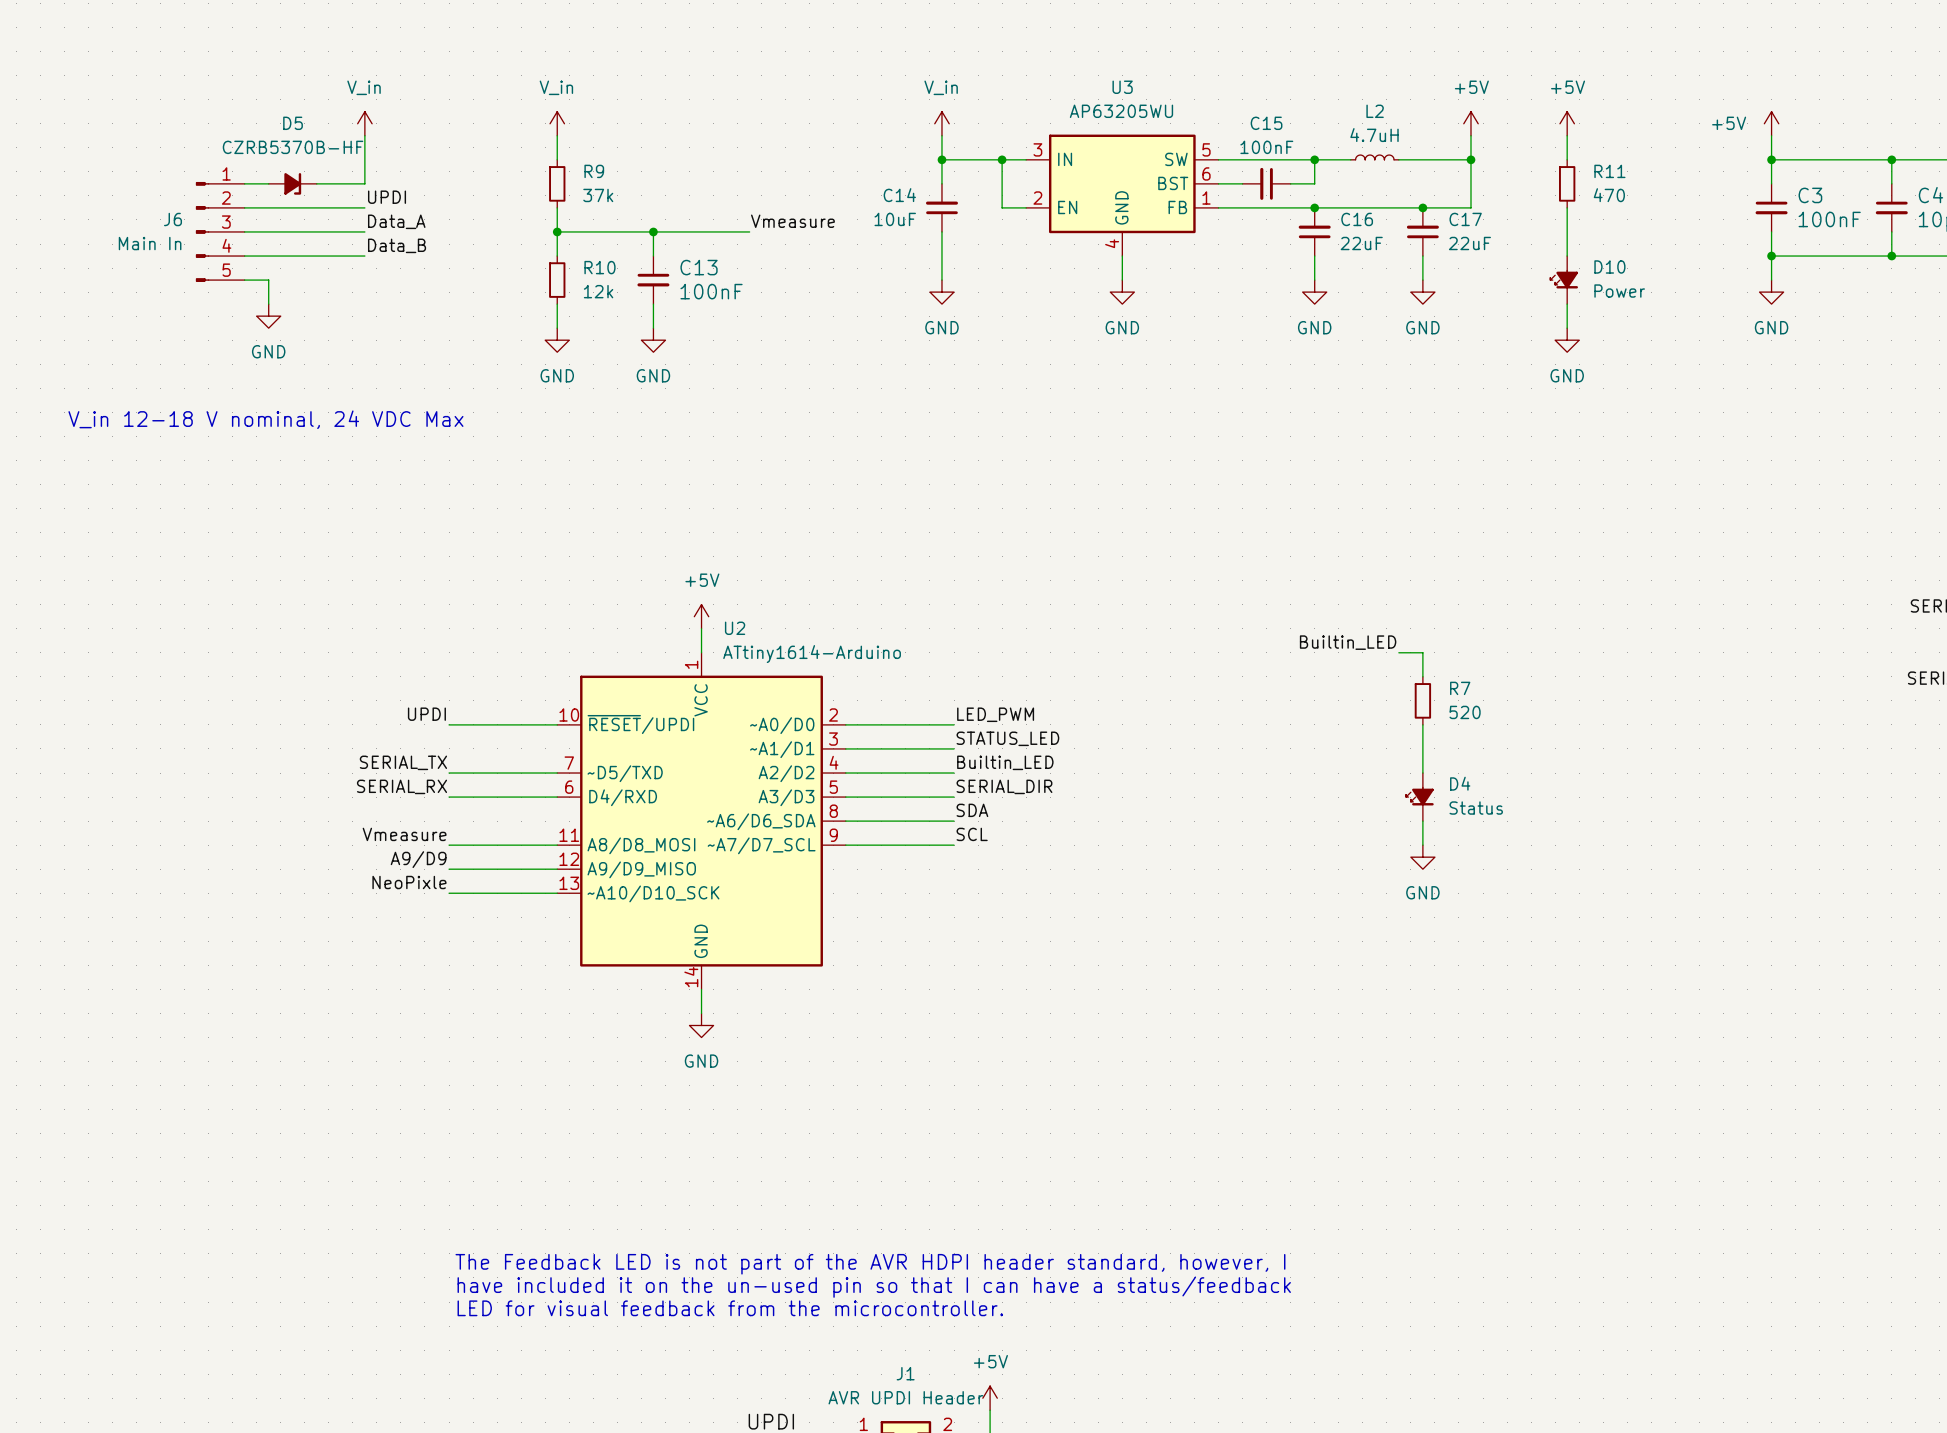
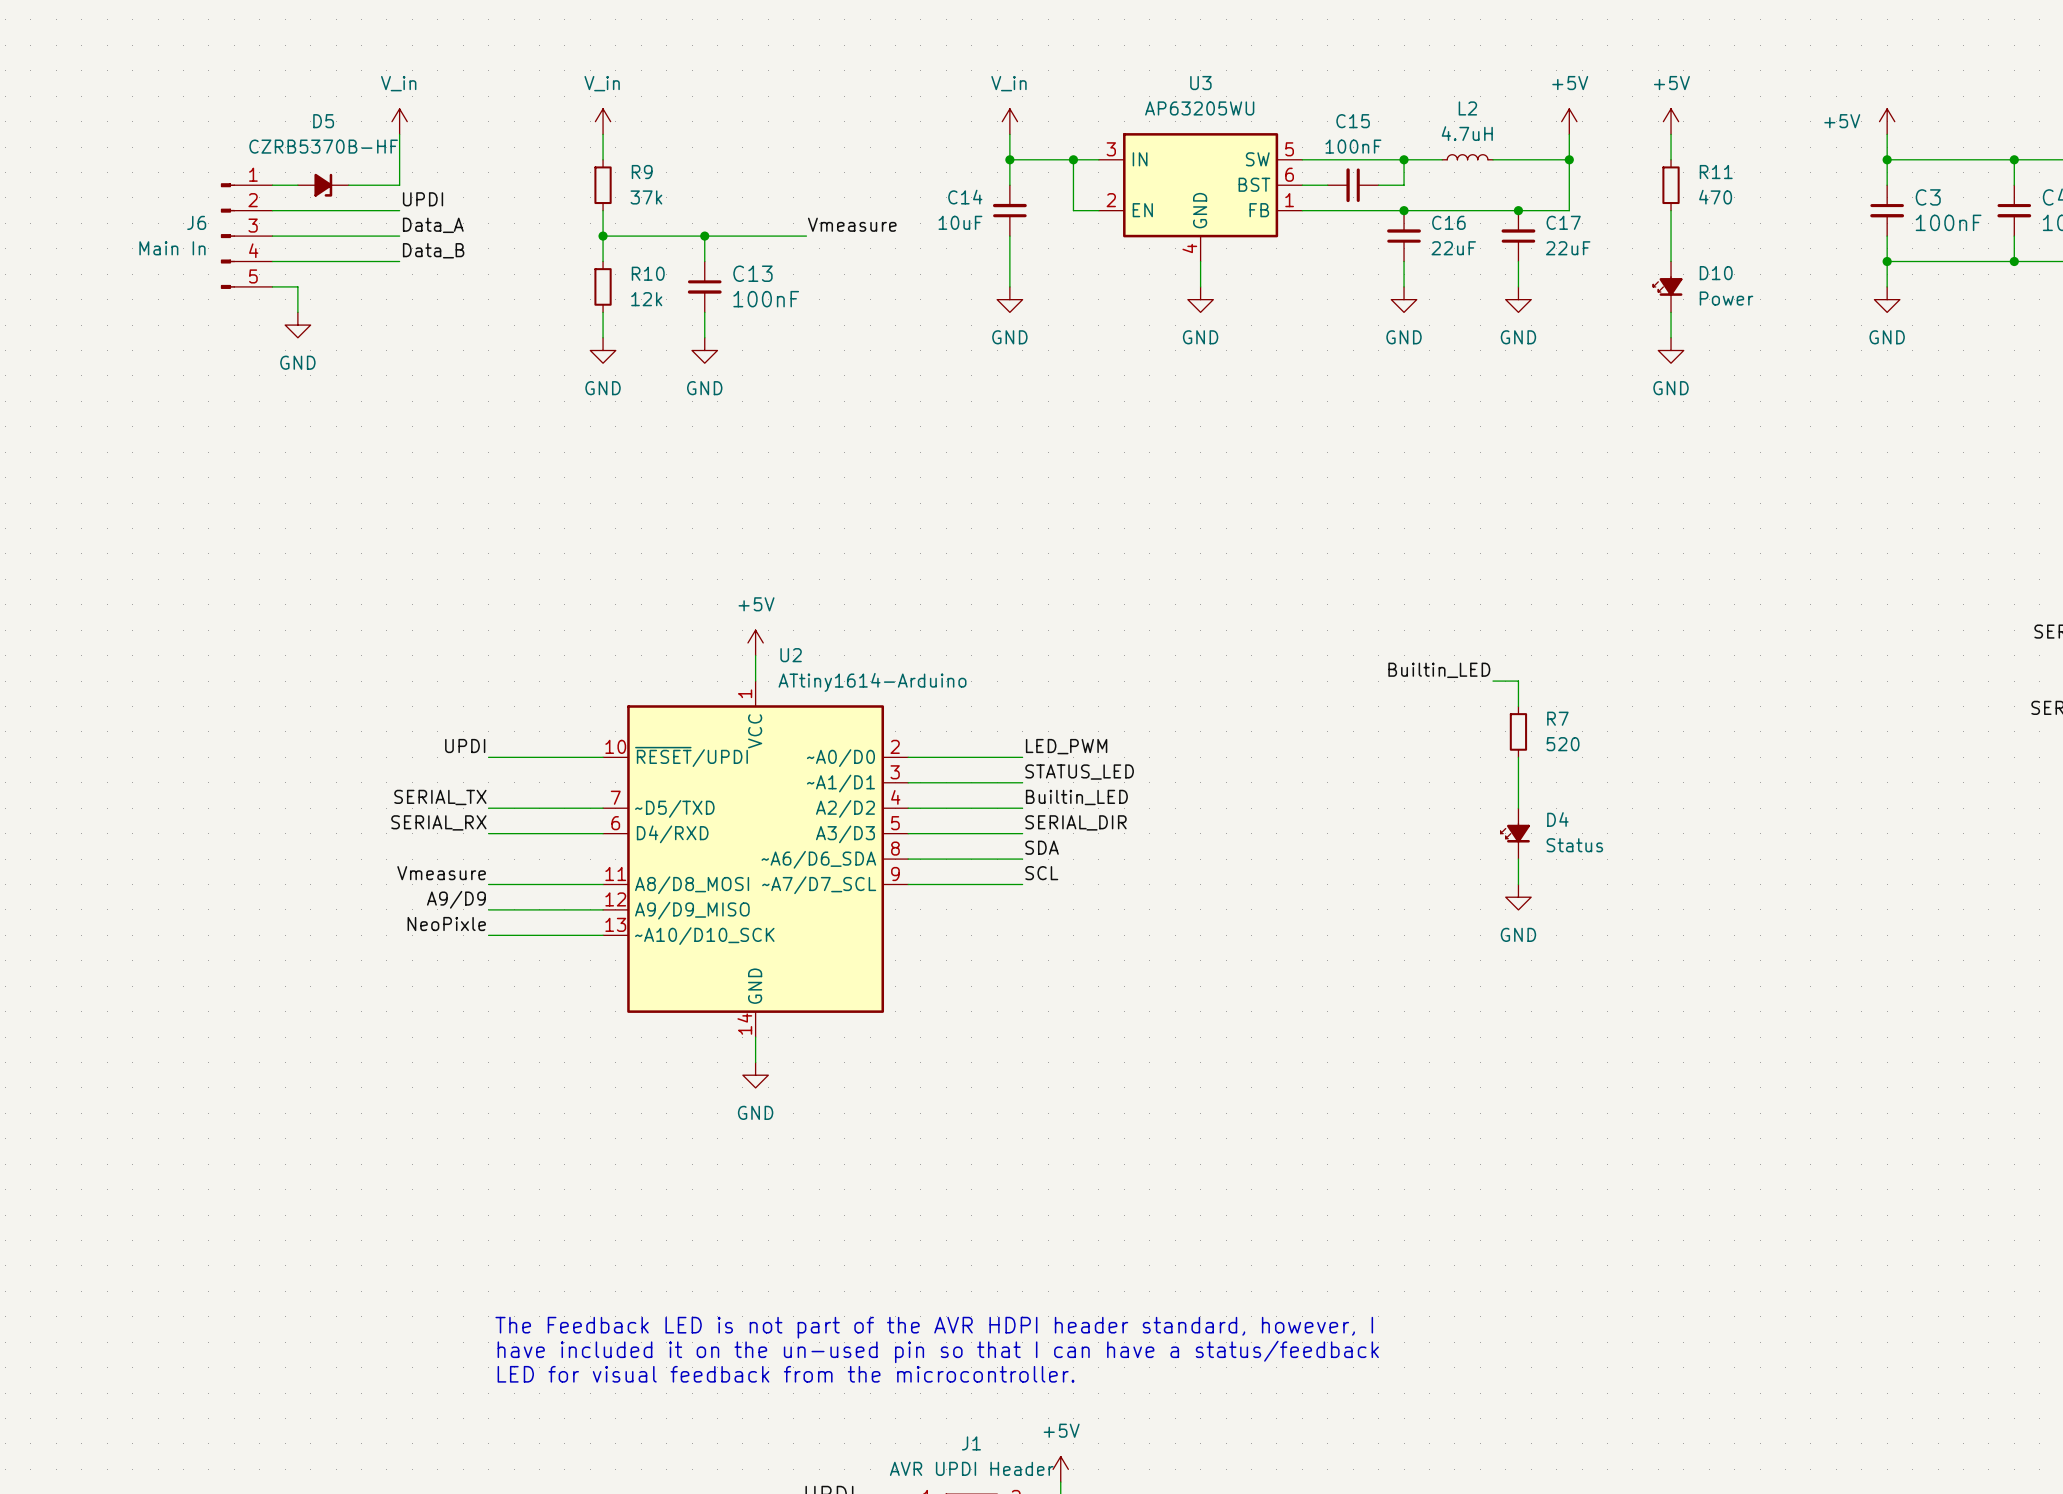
text: V_in 12-18 V nominal, 24 VDC Max (265, 419) -> none

